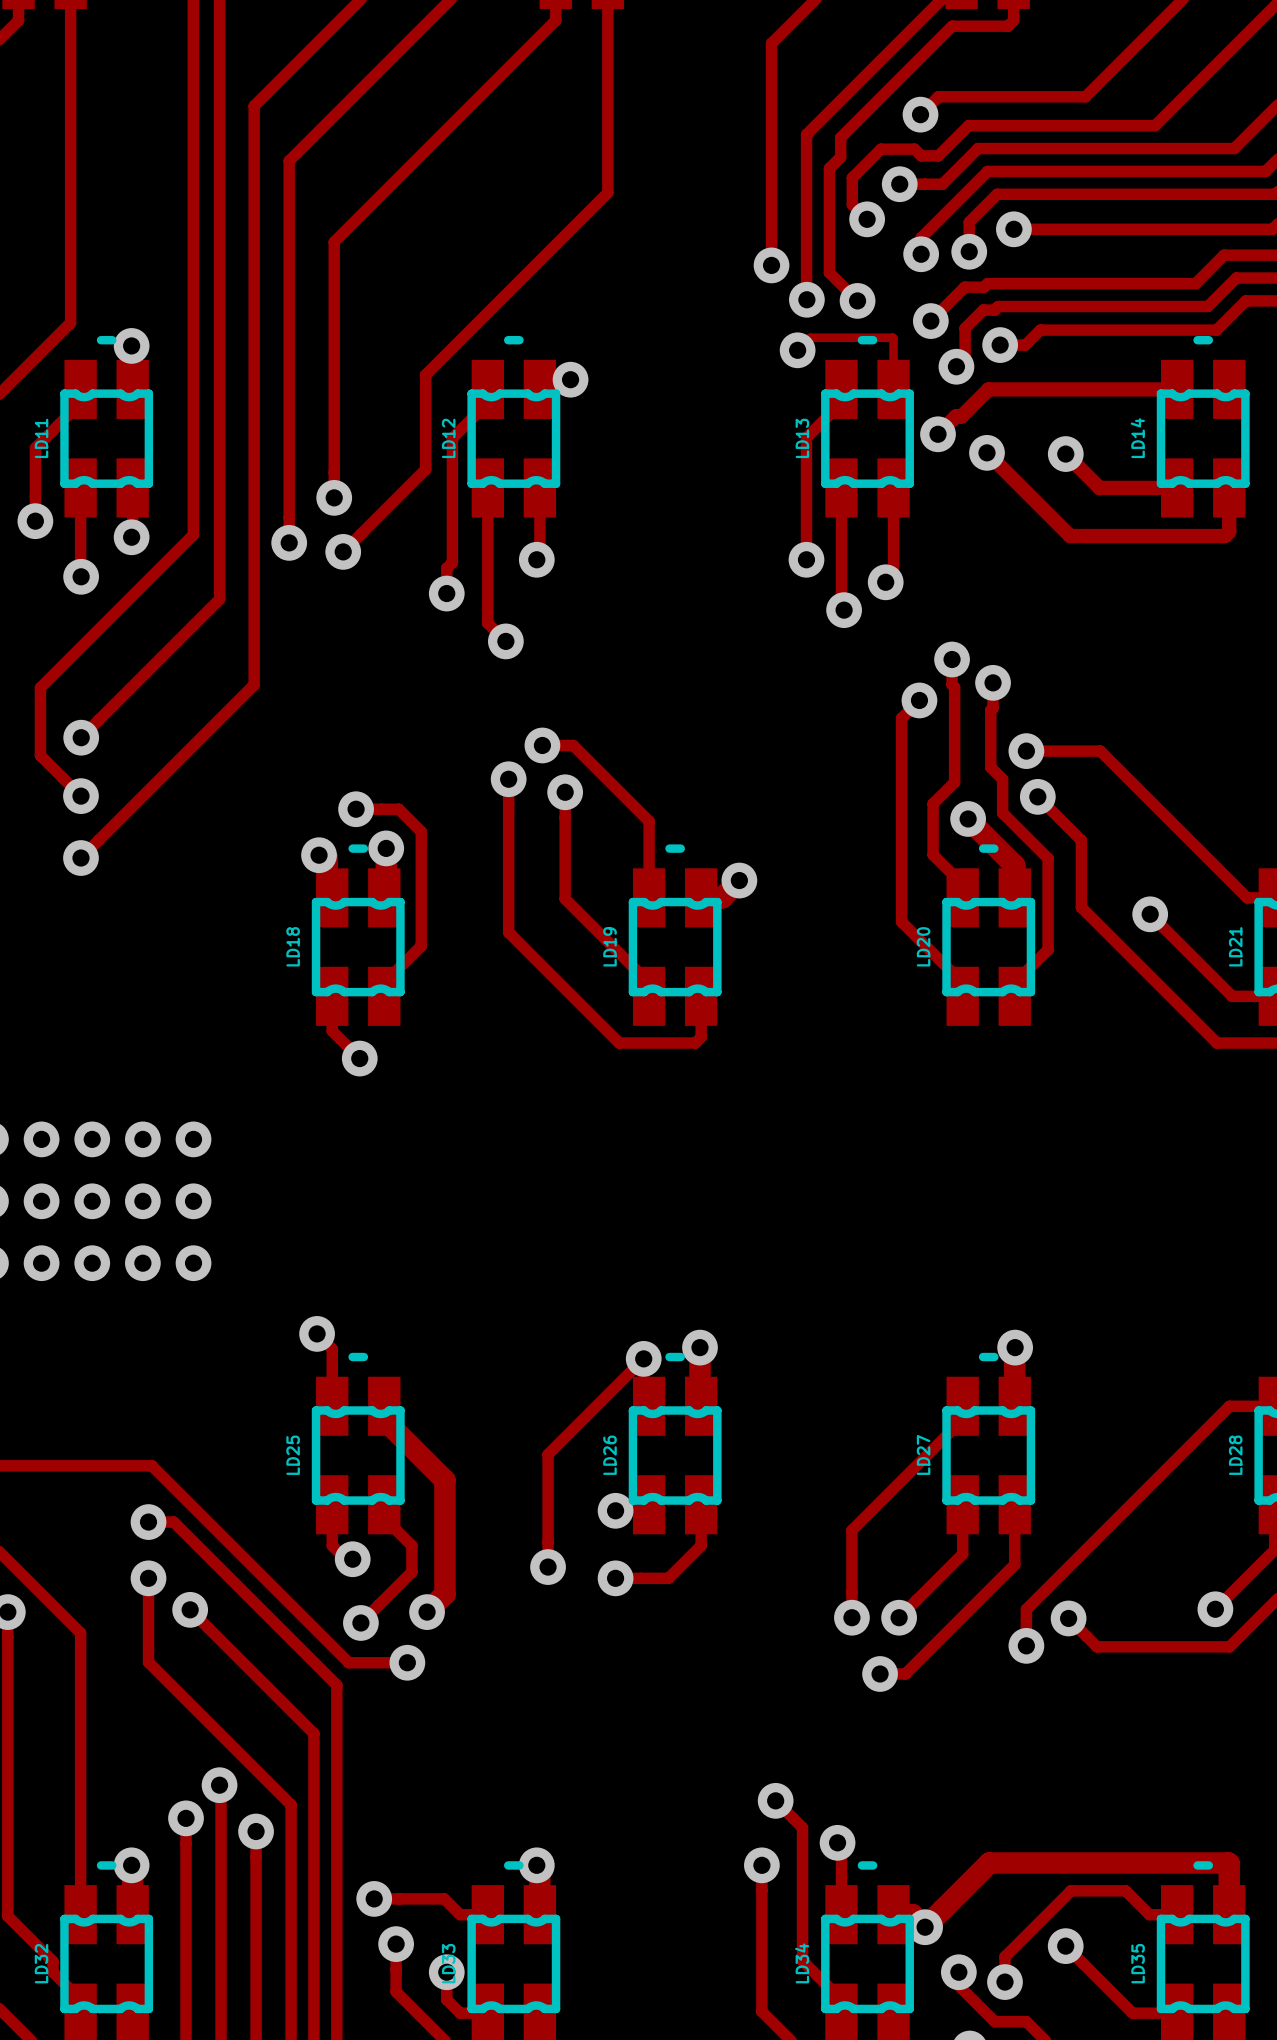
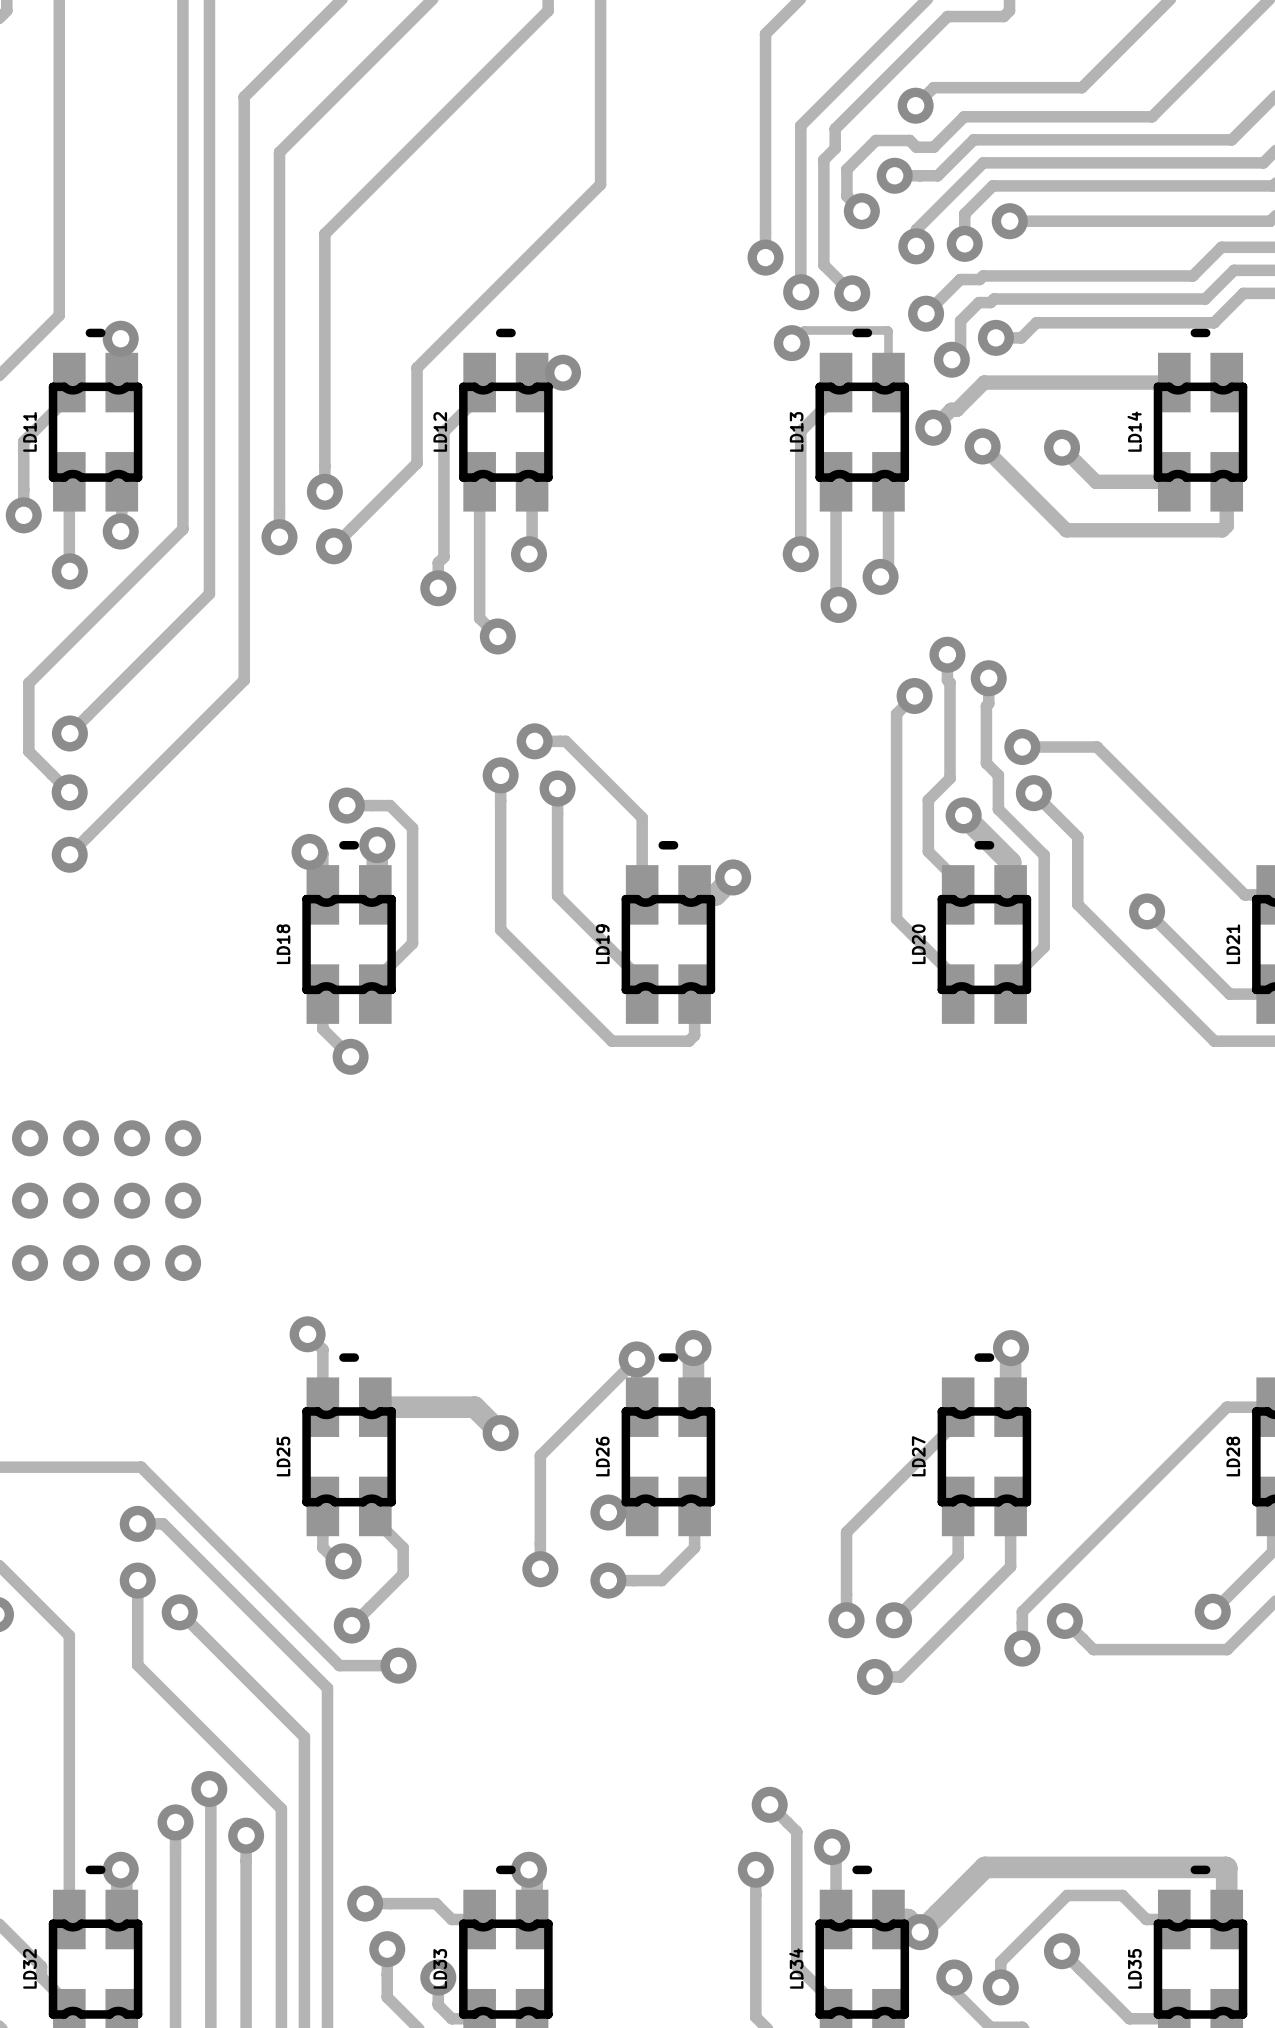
track: (384, 1406) (384, 1419) (444, 1480) (444, 1594) (427, 1612) -> (375, 1407) (474, 1407) (500, 1433)
via position: (427, 1612) -> (500, 1433)

